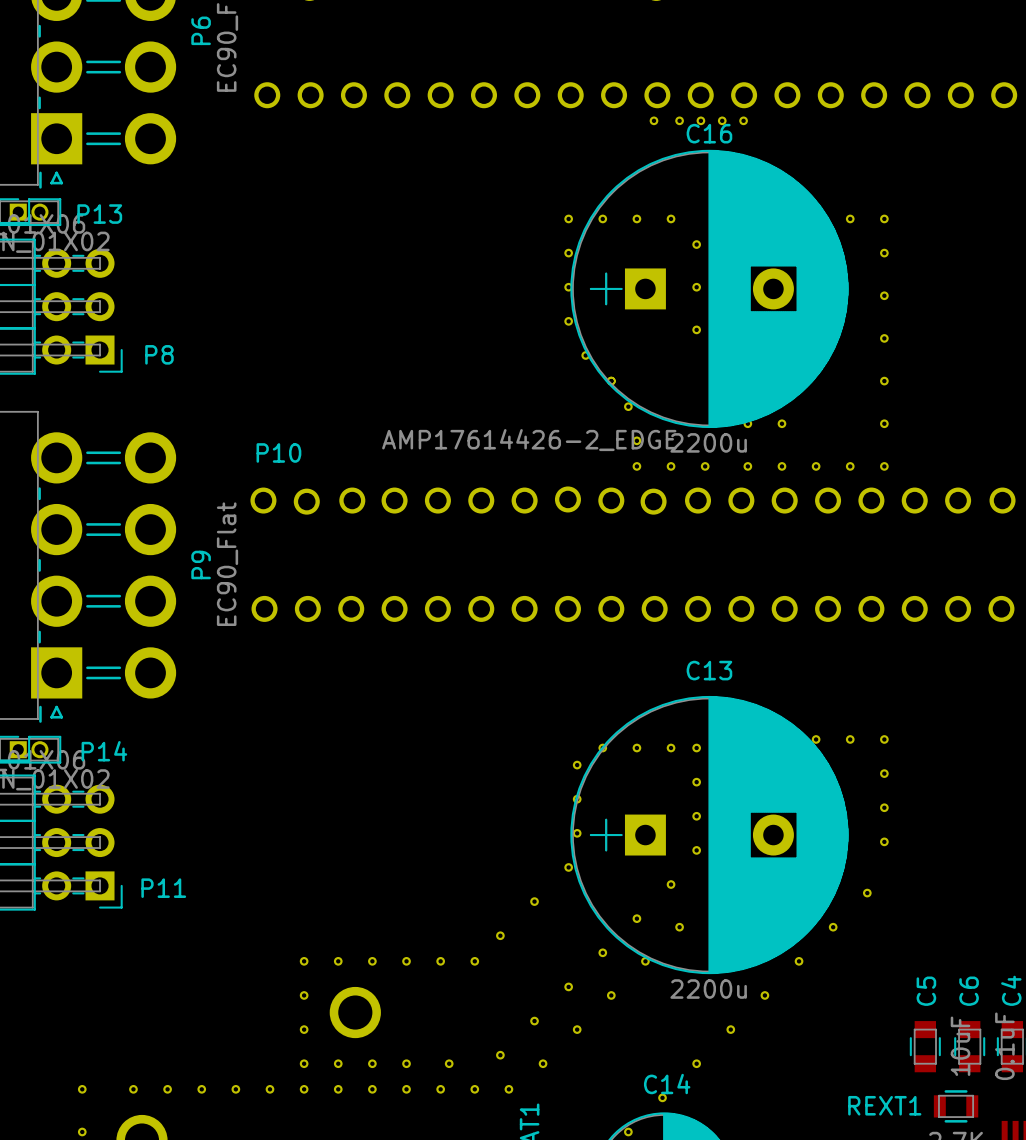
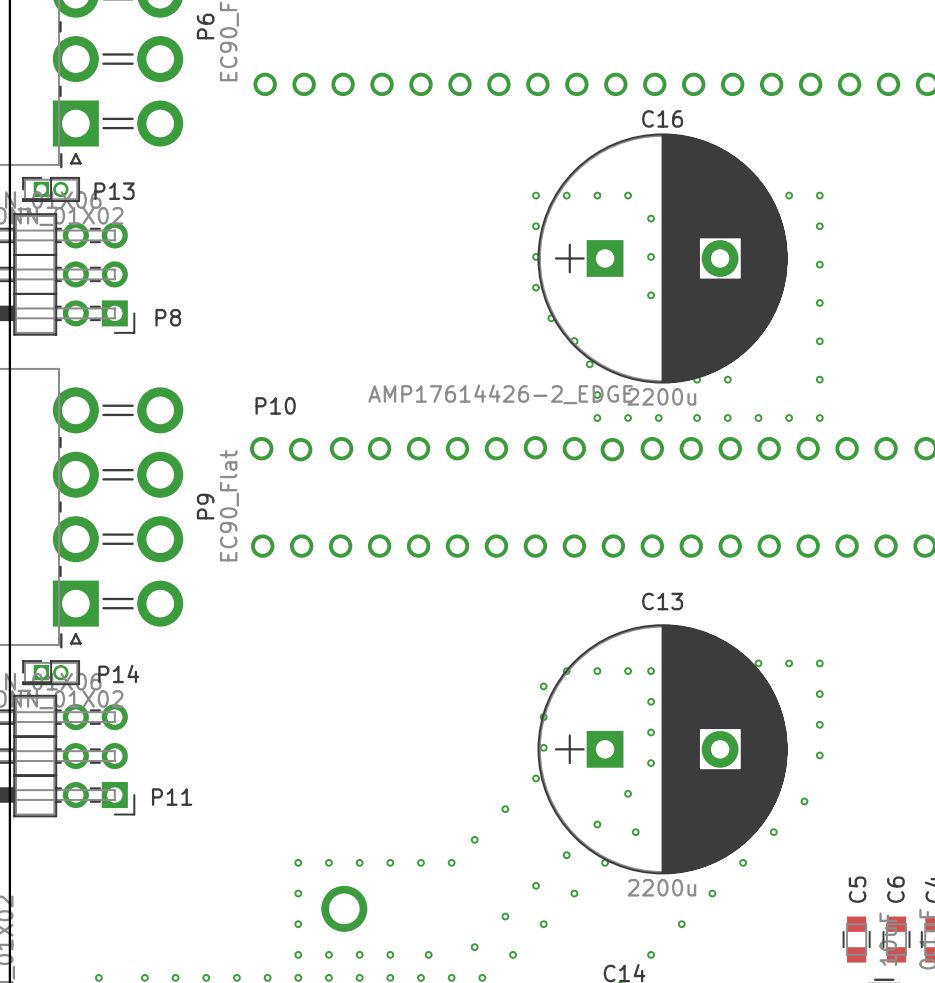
part: (653, 120) -> none
part: (679, 120) -> none
part: (700, 120) -> none
part: (722, 120) -> none
part: (743, 120) -> none

